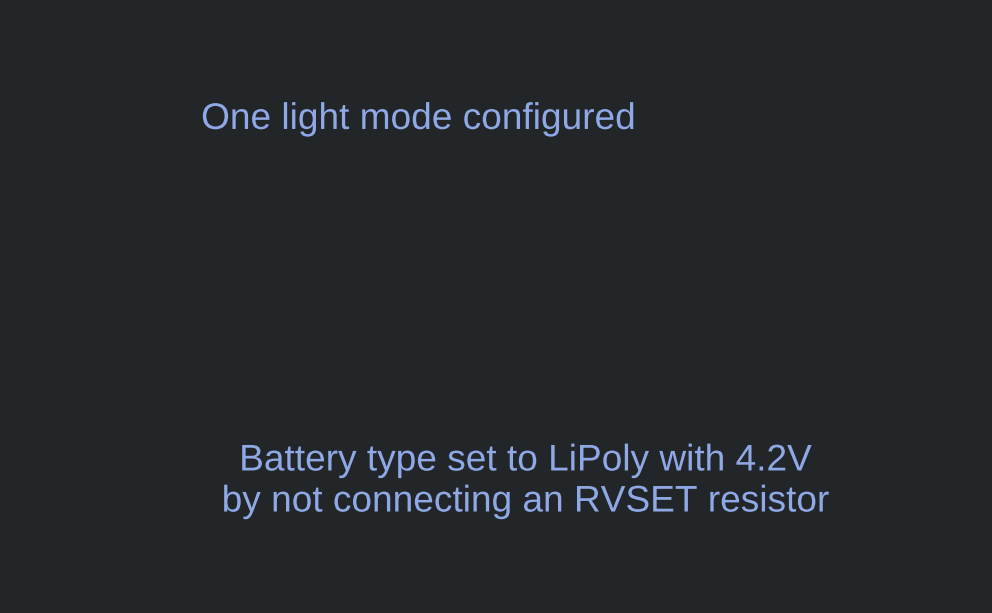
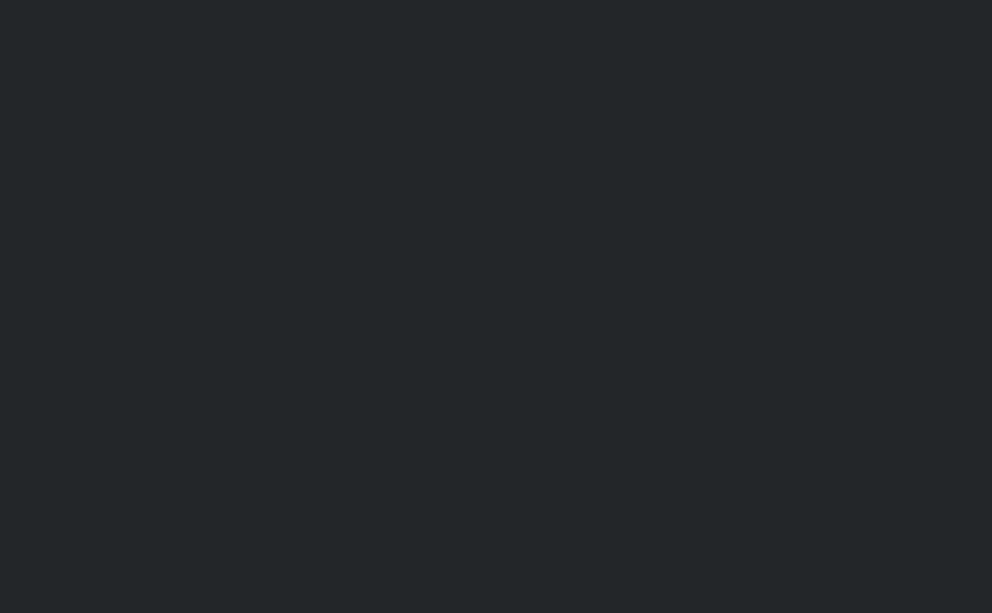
text: One light mode configured (418, 119) -> none
text: Battery type set to LiPoly with 4.2V (526, 460) -> none
text: by not connecting an RVSET resistor (526, 501) -> none

